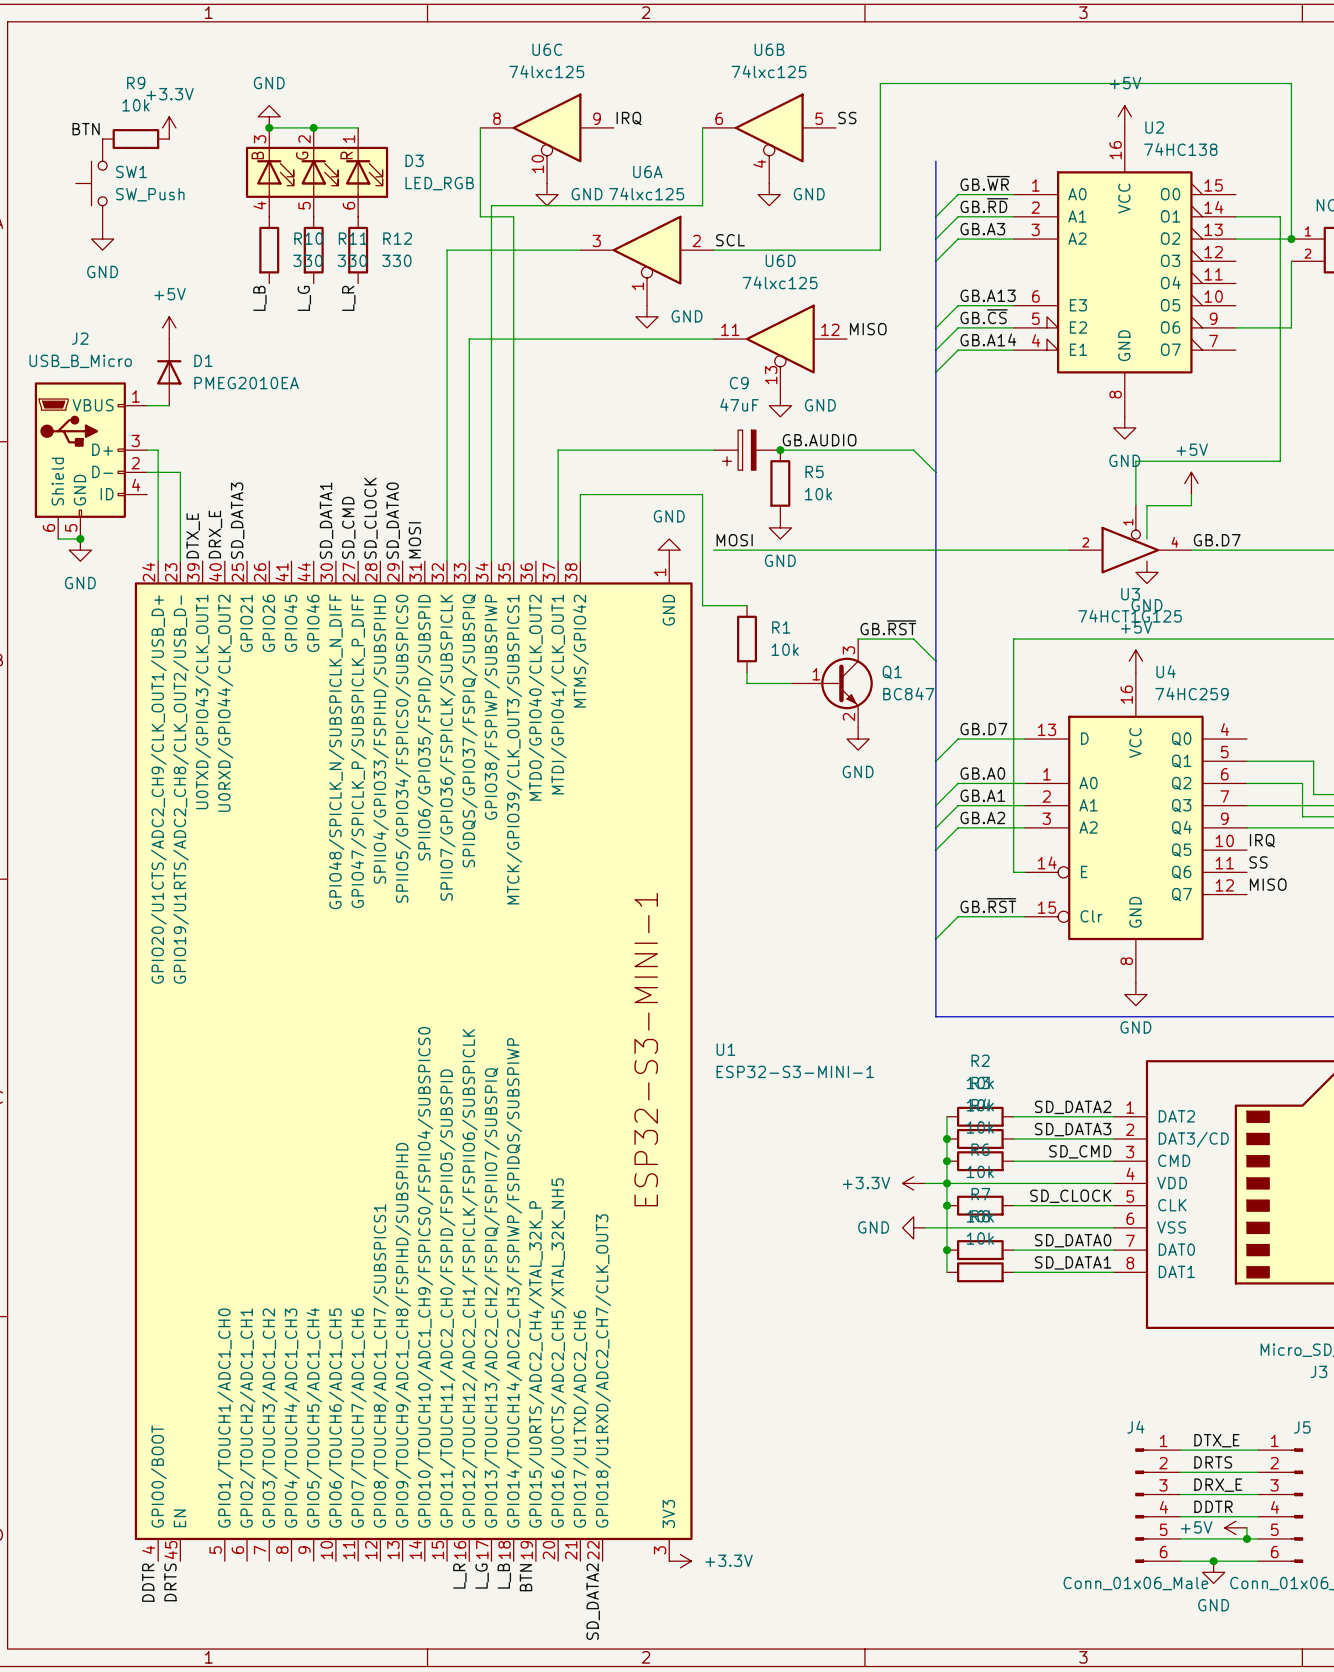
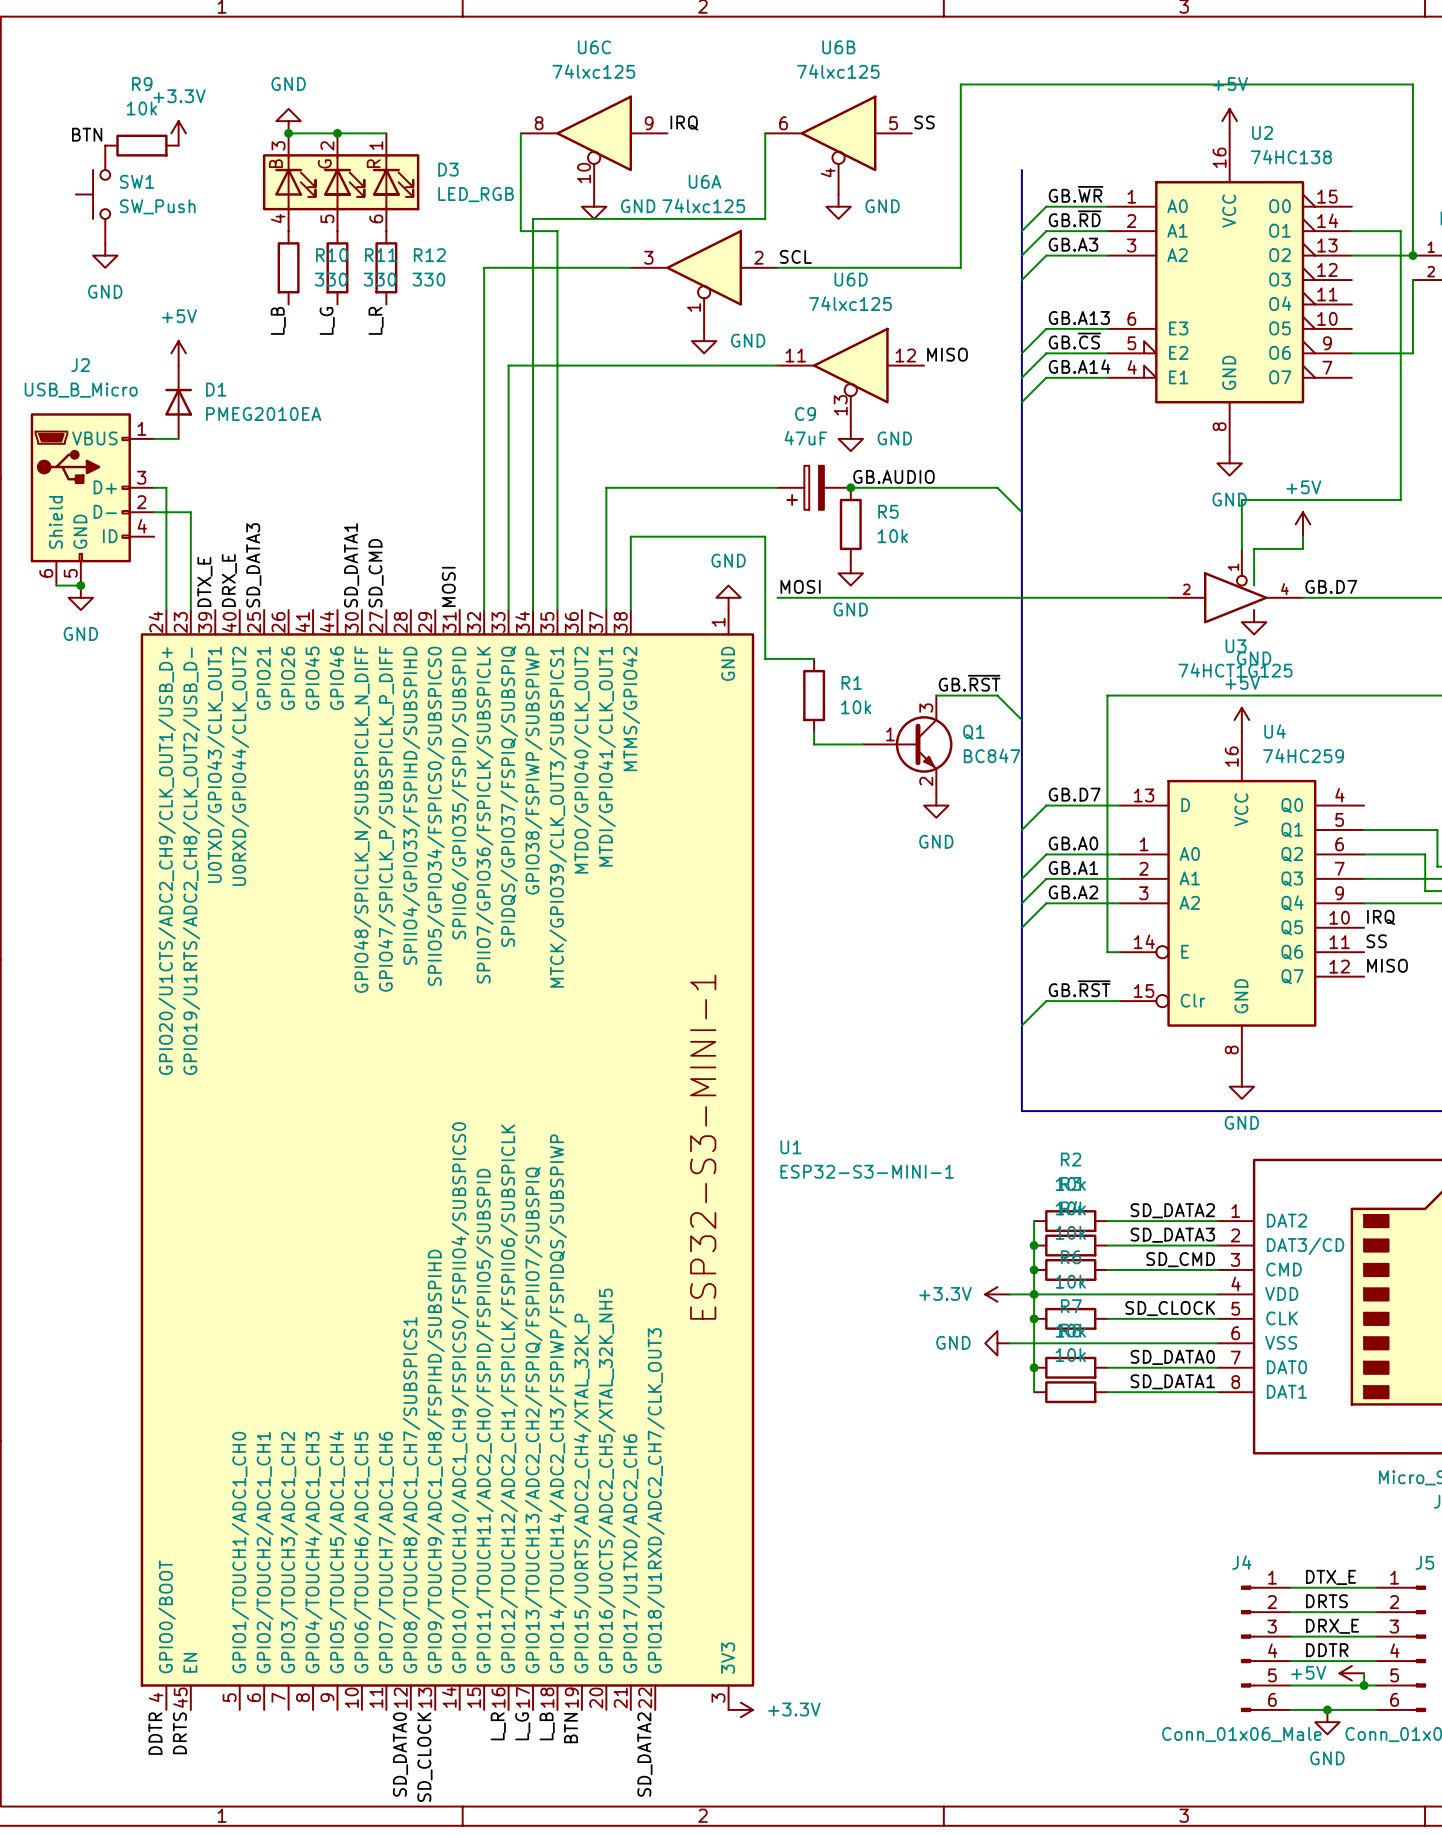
label: SD_CLOCK (370, 518) -> none
label: SD_DATA0 (393, 520) -> none
label: none -> SD_DATA0 (400, 1754)
label: none -> SD_CLOCK (424, 1757)

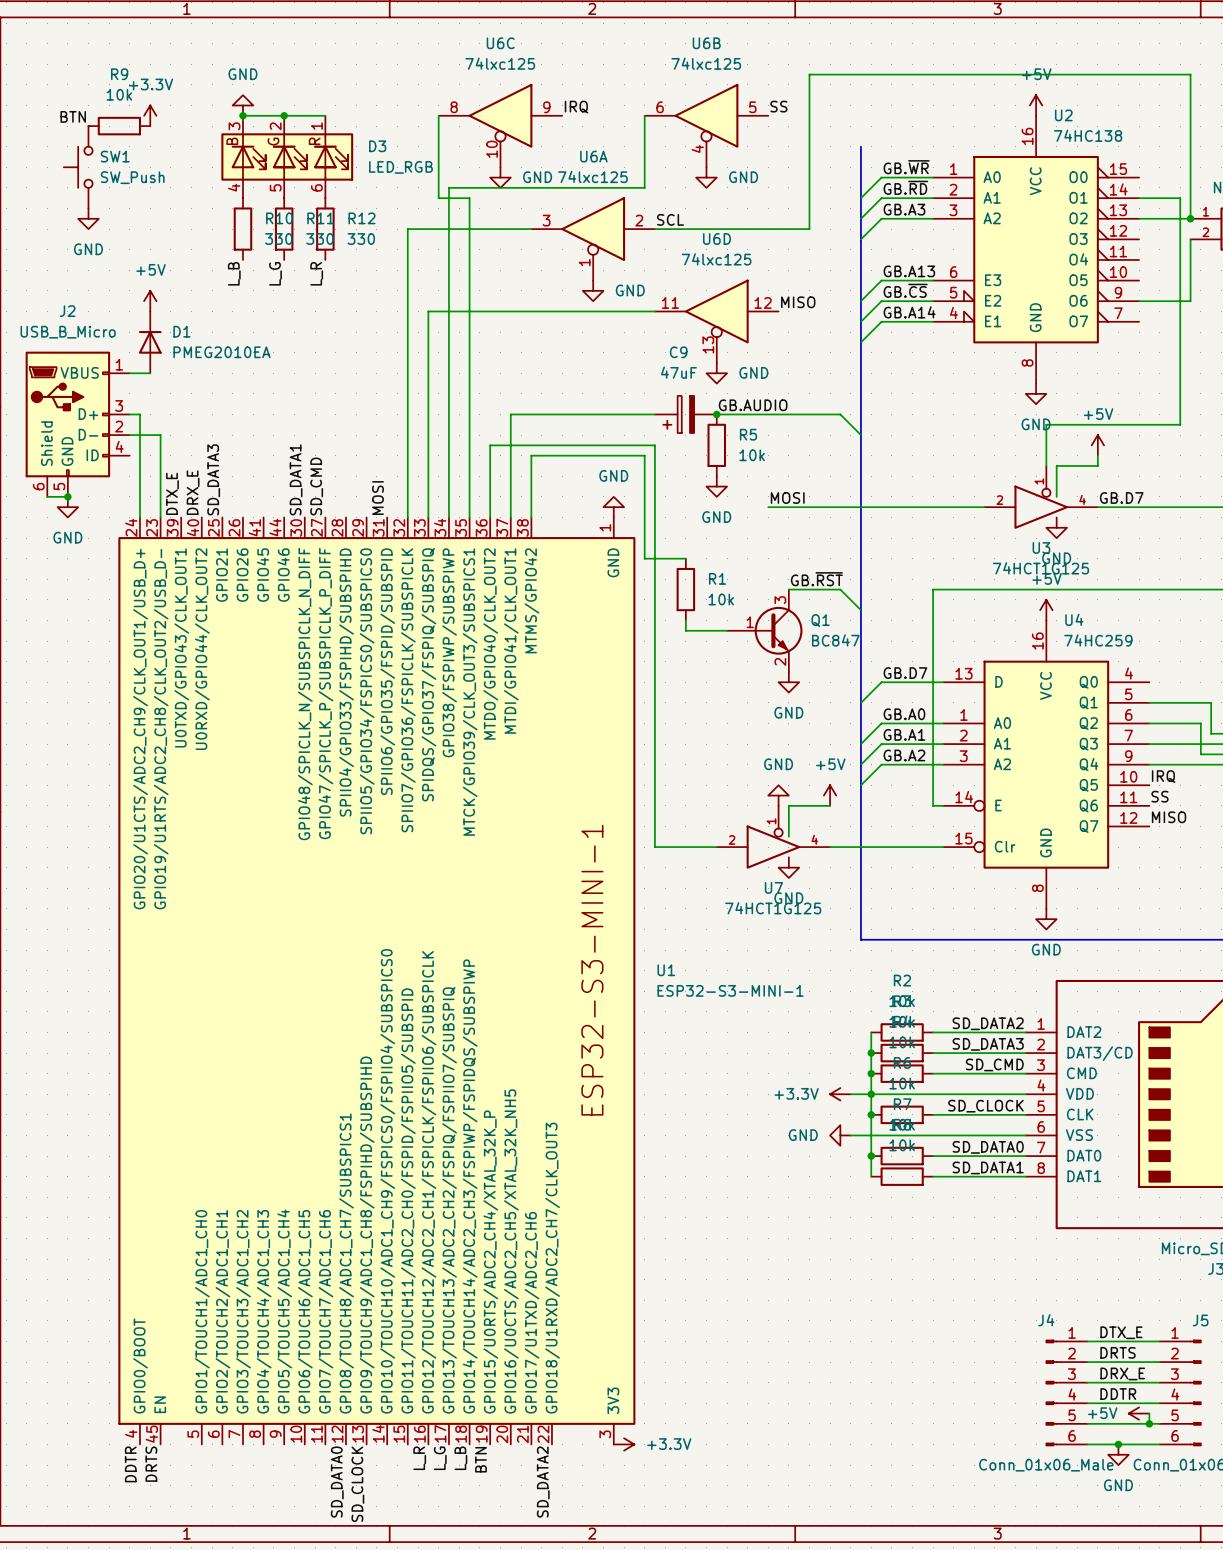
label position: MOSI (800, 586) -> MOSI (787, 497)
wire: (777, 597) (911, 597) -> none
wire: none -> (490, 517) (490, 445) (654, 445) (654, 847) (716, 847)
power symbol: none -> GND (778, 795)
power symbol: none -> +5V (830, 795)
wire: none -> (830, 805) (788, 805) (788, 836)
label: GB.~{RST} (1079, 988) -> none
U7: none -> 74HCT1G125 (773, 837)
wire: (1046, 1001) (1021, 1025) -> (881, 847) (830, 847)
power symbol: none -> GND (788, 867)

